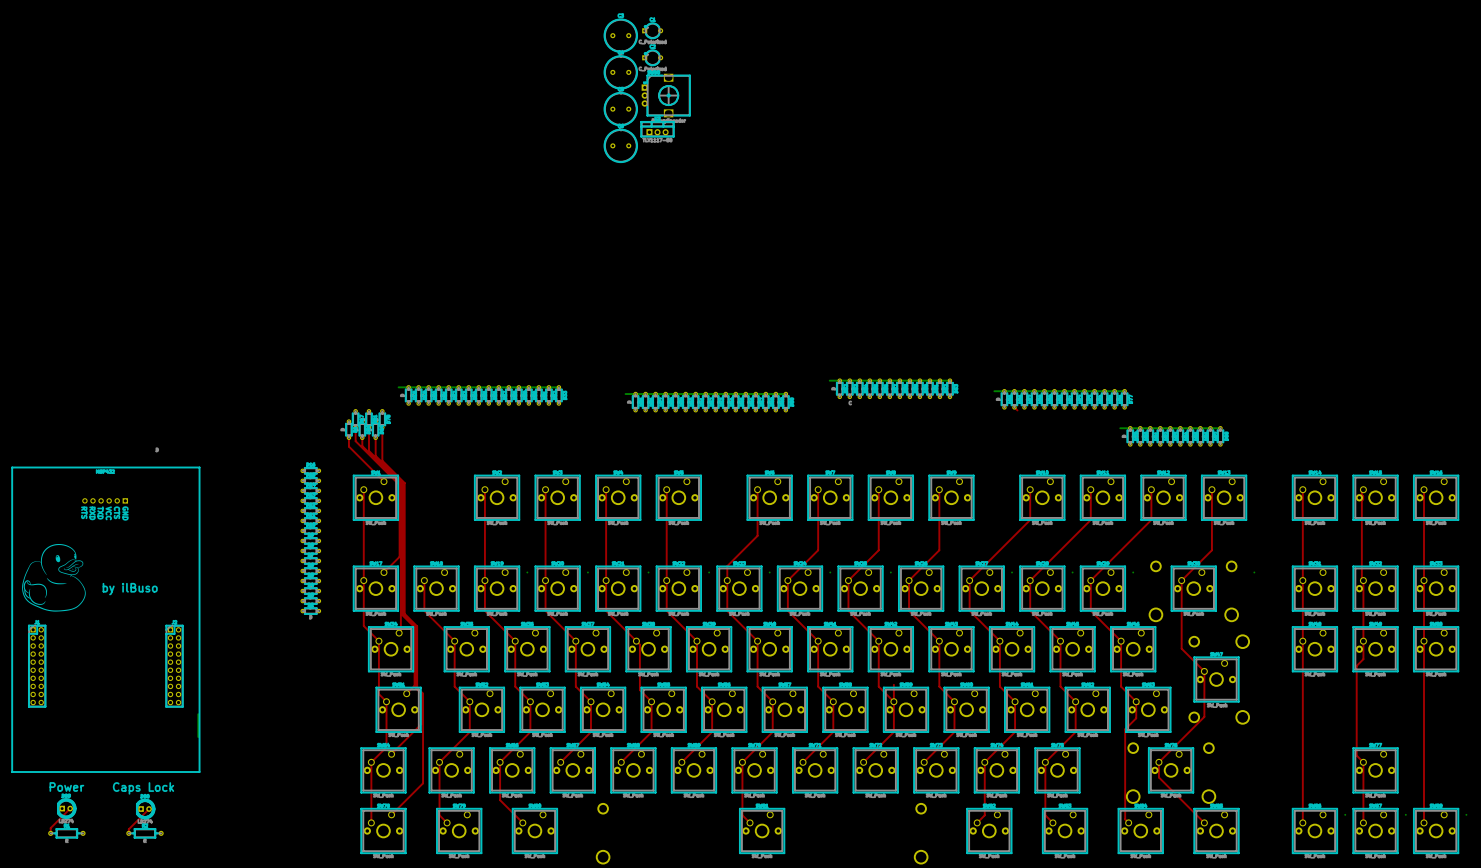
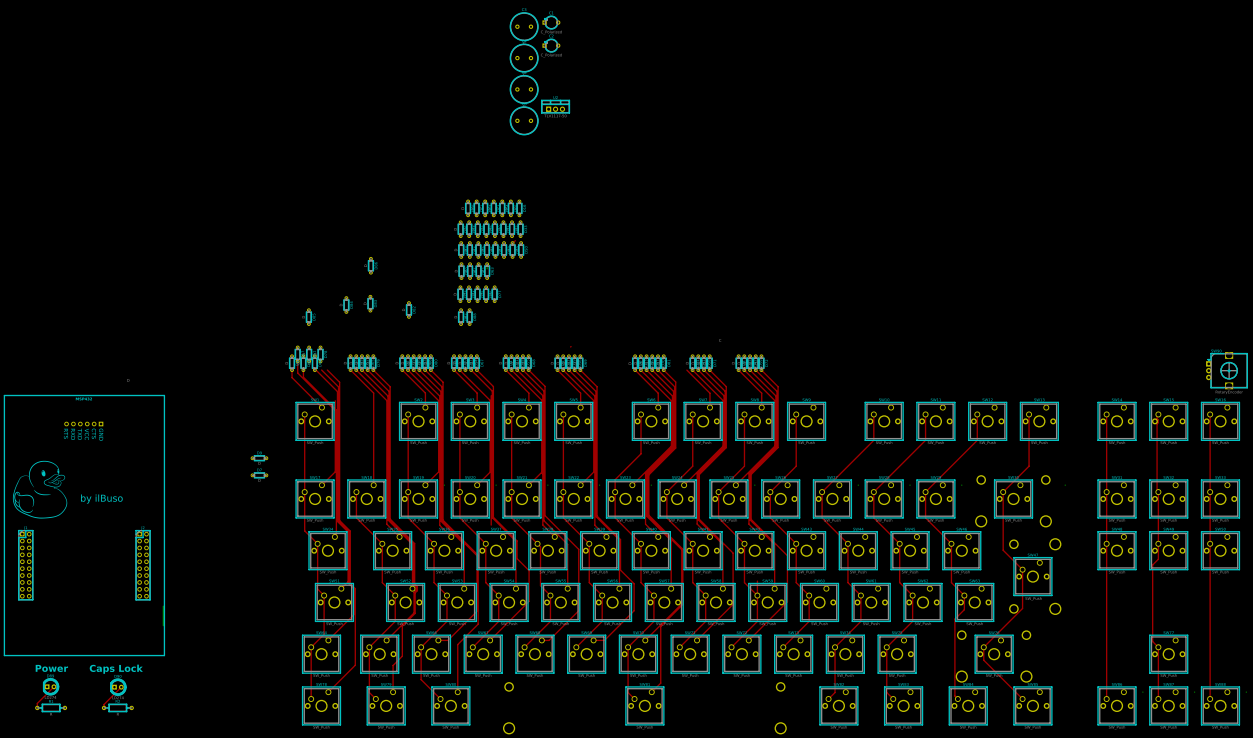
part position: (665, 95) -> (1226, 370)
top track: none -> (515, 240) (512, 243)
bottom track: none -> (487, 267) (487, 268)
bottom track: (829, 380) (949, 380) -> none
bottom track: (398, 387) (558, 387) -> none
part position: (839, 388) -> (361, 363)
part position: (849, 388) -> (419, 363)
part position: (859, 388) -> (471, 363)
part position: (869, 388) -> (522, 363)
part position: (879, 388) -> (574, 363)
part position: (889, 388) -> (652, 363)
part position: (899, 388) -> (704, 363)
part position: (909, 388) -> (755, 363)
part position: (919, 388) -> (461, 271)
part position: (929, 388) -> (470, 271)
part position: (939, 388) -> (478, 271)
part position: (949, 388) -> (487, 271)
bottom track: (994, 391) (1124, 391) -> none
bottom track: (625, 394) (785, 394) -> none
part position: (408, 395) -> (350, 363)
part position: (418, 395) -> (407, 363)
part position: (428, 395) -> (459, 363)
part position: (438, 395) -> (511, 363)
part position: (448, 395) -> (563, 363)
part position: (458, 395) -> (640, 363)
part position: (468, 395) -> (692, 363)
part position: (478, 395) -> (744, 363)
part position: (488, 395) -> (460, 229)
part position: (498, 395) -> (469, 229)
part position: (508, 395) -> (477, 229)
part position: (518, 395) -> (486, 229)
part position: (528, 395) -> (494, 229)
part position: (538, 395) -> (503, 229)
part position: (548, 395) -> (512, 229)
part position: (558, 395) -> (520, 229)
part position: (1004, 399) -> (367, 363)
part position: (1014, 399) -> (425, 363)
part position: (1024, 399) -> (476, 363)
part position: (1034, 399) -> (528, 363)
part position: (1044, 399) -> (580, 363)
part position: (1054, 399) -> (658, 363)
part position: (1064, 399) -> (709, 363)
part position: (1074, 399) -> (761, 363)
part position: (1084, 399) -> (460, 294)
part position: (1094, 399) -> (468, 294)
part position: (1104, 399) -> (477, 294)
part position: (1114, 399) -> (486, 294)
part position: (1124, 399) -> (494, 294)
part position: (635, 402) -> (356, 363)
part position: (645, 402) -> (413, 363)
part position: (655, 402) -> (465, 363)
part position: (665, 402) -> (517, 363)
part position: (675, 402) -> (568, 363)
part position: (685, 402) -> (646, 363)
part position: (695, 402) -> (698, 363)
part position: (705, 402) -> (750, 363)
part position: (715, 402) -> (461, 250)
part position: (725, 402) -> (469, 250)
part position: (735, 402) -> (478, 250)
part position: (745, 402) -> (486, 250)
part position: (755, 402) -> (495, 250)
part position: (765, 402) -> (504, 250)
part position: (775, 402) -> (512, 250)
part position: (785, 402) -> (521, 250)
top track: (1014, 407) (1017, 410) -> none
top track: (368, 427) (368, 450) (402, 484) -> (315, 370) (337, 391) (337, 409)
top track: (382, 427) (382, 460) (404, 483) -> (327, 370) (339, 382) (339, 408)
bottom track: (1120, 428) (1220, 428) -> none
part position: (1130, 436) -> (373, 363)
part position: (1140, 436) -> (430, 363)
part position: (1150, 436) -> (663, 363)
part position: (1160, 436) -> (408, 309)
part position: (1170, 436) -> (370, 303)
part position: (1180, 436) -> (346, 305)
part position: (1190, 436) -> (308, 317)
part position: (1200, 436) -> (370, 265)
part position: (1210, 436) -> (461, 317)
part position: (1220, 436) -> (469, 317)
top track: (375, 437) (375, 455) (403, 483) -> (321, 370) (338, 386) (338, 409)
top track: none -> (350, 370) (373, 393) (373, 485)
top track: none -> (356, 370) (386, 400) (386, 524) (399, 536)
top track: none -> (361, 370) (387, 396) (387, 519) (412, 544) (412, 588)
top track: none -> (367, 370) (389, 391) (389, 519) (413, 544) (413, 584) (416, 587) (414, 592) (414, 612) (386, 640)
top track: none -> (373, 370) (390, 386) (390, 519) (414, 543) (414, 583) (417, 586) (415, 592) (415, 613) (402, 626) (402, 656) (393, 665) (393, 692)
top track: none -> (402, 370) (425, 393) (425, 407)
top track: none -> (407, 370) (438, 400) (438, 471) (425, 485)
top track: none -> (413, 370) (439, 396) (439, 525) (451, 536)
top track: none -> (419, 370) (440, 391) (440, 521) (464, 544) (464, 588)
top track: none -> (425, 370) (441, 386) (441, 520) (477, 555) (477, 611) (447, 640) (438, 640)
top track: none -> (430, 370) (443, 382) (443, 520) (478, 555) (478, 624) (457, 644) (457, 692)
top track: none -> (454, 370) (477, 393) (477, 407)
top track: none -> (459, 370) (490, 400) (490, 472) (477, 485)
top track: none -> (471, 370) (492, 391) (492, 517) (515, 541) (515, 588)
top track: none -> (476, 370) (493, 386) (493, 517) (517, 540) (517, 558) (529, 570) (529, 601) (490, 640)
top track: none -> (505, 370) (528, 393) (528, 407)
top track: none -> (511, 370) (541, 400) (541, 472) (528, 485)
top track: none -> (517, 370) (542, 395) (542, 524) (554, 536)
top track: none -> (522, 370) (543, 390) (543, 520) (567, 544) (567, 588)
top track: none -> (528, 370) (544, 386) (544, 515) (578, 549) (578, 610) (549, 640) (541, 640)
top track: none -> (557, 370) (580, 393) (580, 407)
top track: none -> (563, 370) (593, 400) (593, 472) (580, 485)
top track: none -> (568, 370) (594, 396) (594, 525) (606, 536)
top track: none -> (574, 370) (595, 391) (595, 516) (619, 540) (619, 588)
top track: none -> (580, 370) (597, 386) (597, 516) (620, 539) (620, 570) (634, 583) (634, 610) (604, 640) (593, 640)
top track: none -> (635, 370) (658, 393) (658, 407)
top track: none -> (640, 370) (671, 400) (671, 446) (632, 485)
top track: none -> (646, 370) (672, 395) (672, 446) (645, 473) (645, 524) (658, 536)
top track: none -> (652, 370) (673, 391) (673, 447) (646, 474) (646, 516) (671, 540) (671, 588)
top track: none -> (658, 370) (674, 386) (674, 447) (647, 474) (647, 515) (681, 549) (681, 603) (645, 640)
top track: none -> (663, 370) (675, 382) (675, 448) (648, 474) (648, 515) (682, 549) (682, 604) (660, 626) (660, 683) (651, 692)
top track: none -> (686, 370) (709, 393) (709, 407)
top track: none -> (692, 370) (722, 400) (722, 446) (684, 485)
top track: none -> (698, 370) (724, 395) (724, 446) (697, 473) (697, 524) (709, 536)
top track: none -> (704, 370) (725, 391) (725, 447) (698, 474) (698, 519) (722, 544) (722, 588)
top track: none -> (709, 370) (726, 386) (726, 447) (699, 474) (699, 519) (733, 553) (733, 604) (697, 640)
top track: none -> (738, 370) (761, 393) (761, 407)
top track: none -> (744, 370) (774, 400) (774, 446) (735, 485)
top track: none -> (750, 370) (775, 395) (775, 446) (748, 473) (748, 524) (761, 536)
top track: none -> (755, 370) (776, 391) (776, 447) (750, 474) (750, 519) (774, 544) (774, 588)
top track: none -> (761, 370) (778, 386) (778, 447) (751, 474) (751, 519) (787, 555) (787, 601) (748, 640)
top track: none -> (491, 395) (491, 525)
part rotation: 0° (310, 470) -> 90° clockwise (519, 208)
part position: (310, 470) -> (519, 208)
part rotation: 0° (310, 480) -> 90° clockwise (510, 208)
part position: (310, 480) -> (510, 208)
part rotation: 0° (310, 490) -> 90° clockwise (502, 208)
part position: (310, 490) -> (502, 208)
part rotation: 0° (310, 500) -> 90° clockwise (493, 208)
part position: (310, 500) -> (493, 208)
part rotation: 0° (310, 510) -> 90° clockwise (485, 208)
part position: (310, 510) -> (485, 208)
part rotation: 0° (310, 520) -> 90° clockwise (476, 208)
part position: (310, 520) -> (476, 208)
part rotation: 0° (310, 530) -> 90° clockwise (468, 208)
part position: (310, 530) -> (468, 208)
part rotation: 0° (310, 550) -> 90° clockwise (738, 363)
part position: (310, 550) -> (738, 363)
part rotation: 0° (310, 571) -> 90° clockwise (635, 363)
part position: (310, 571) -> (635, 363)
part rotation: 0° (310, 581) -> 90° clockwise (557, 363)
part position: (310, 581) -> (557, 363)
part rotation: 0° (310, 591) -> 90° clockwise (505, 363)
part position: (310, 591) -> (505, 363)
part rotation: 0° (310, 601) -> 90° clockwise (454, 363)
part position: (310, 601) -> (454, 363)
part rotation: 0° (310, 611) -> 90° clockwise (402, 363)
part position: (310, 611) -> (402, 363)

